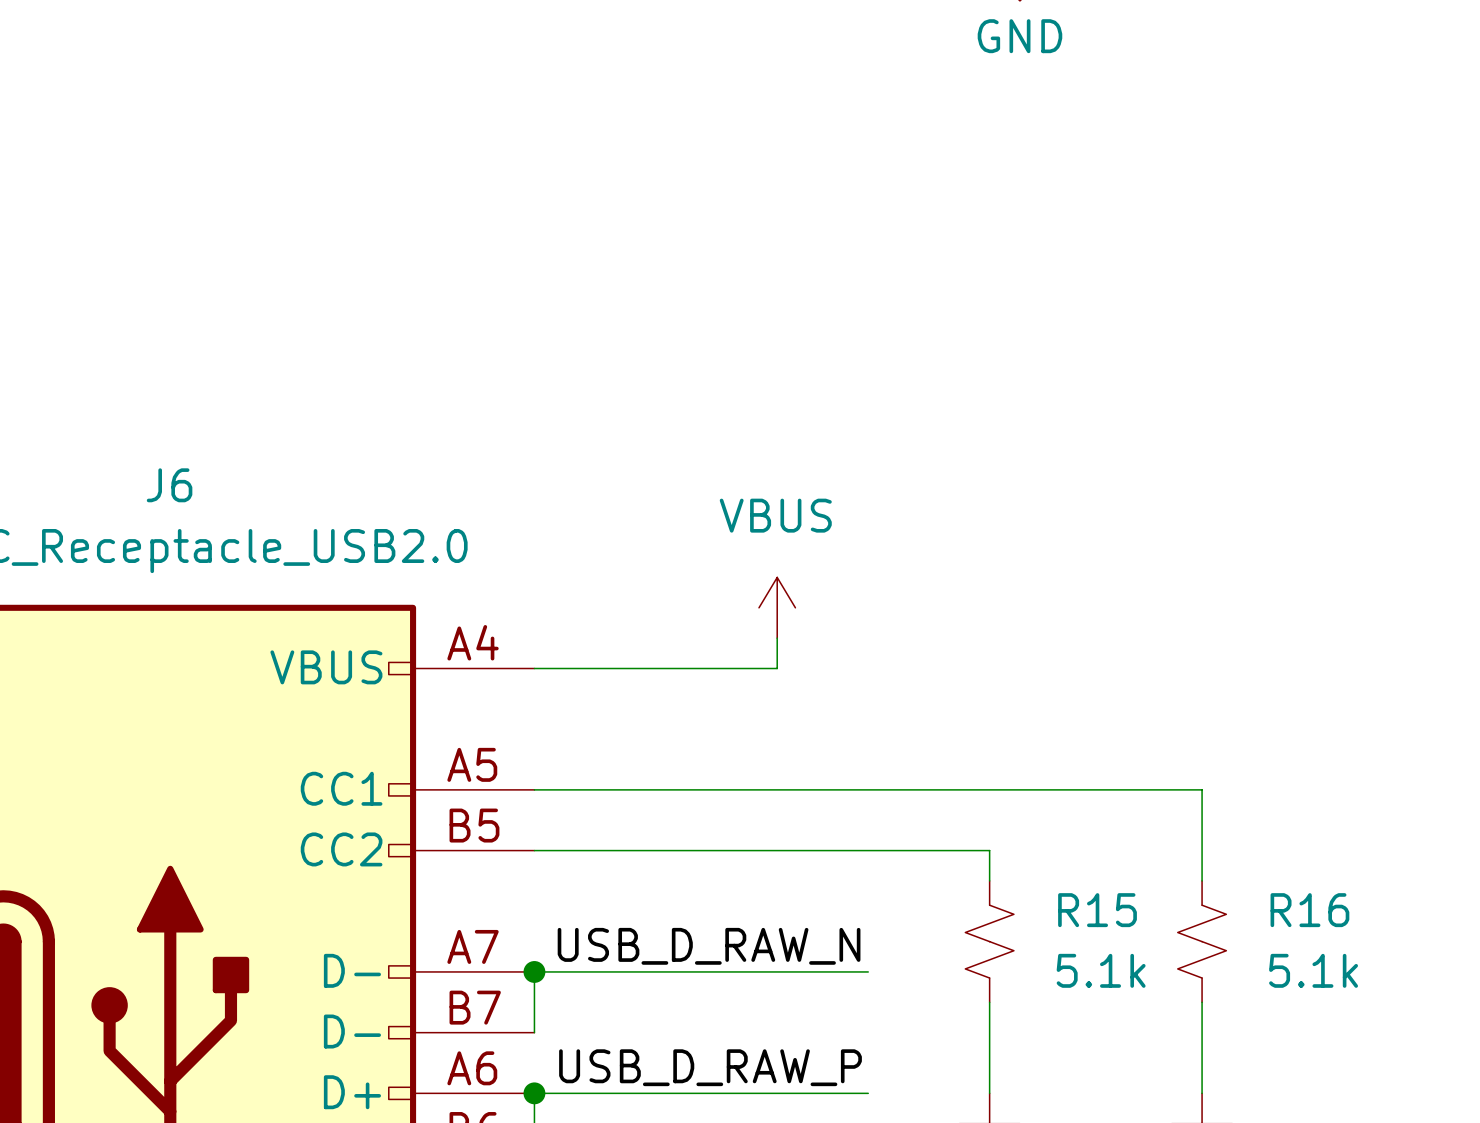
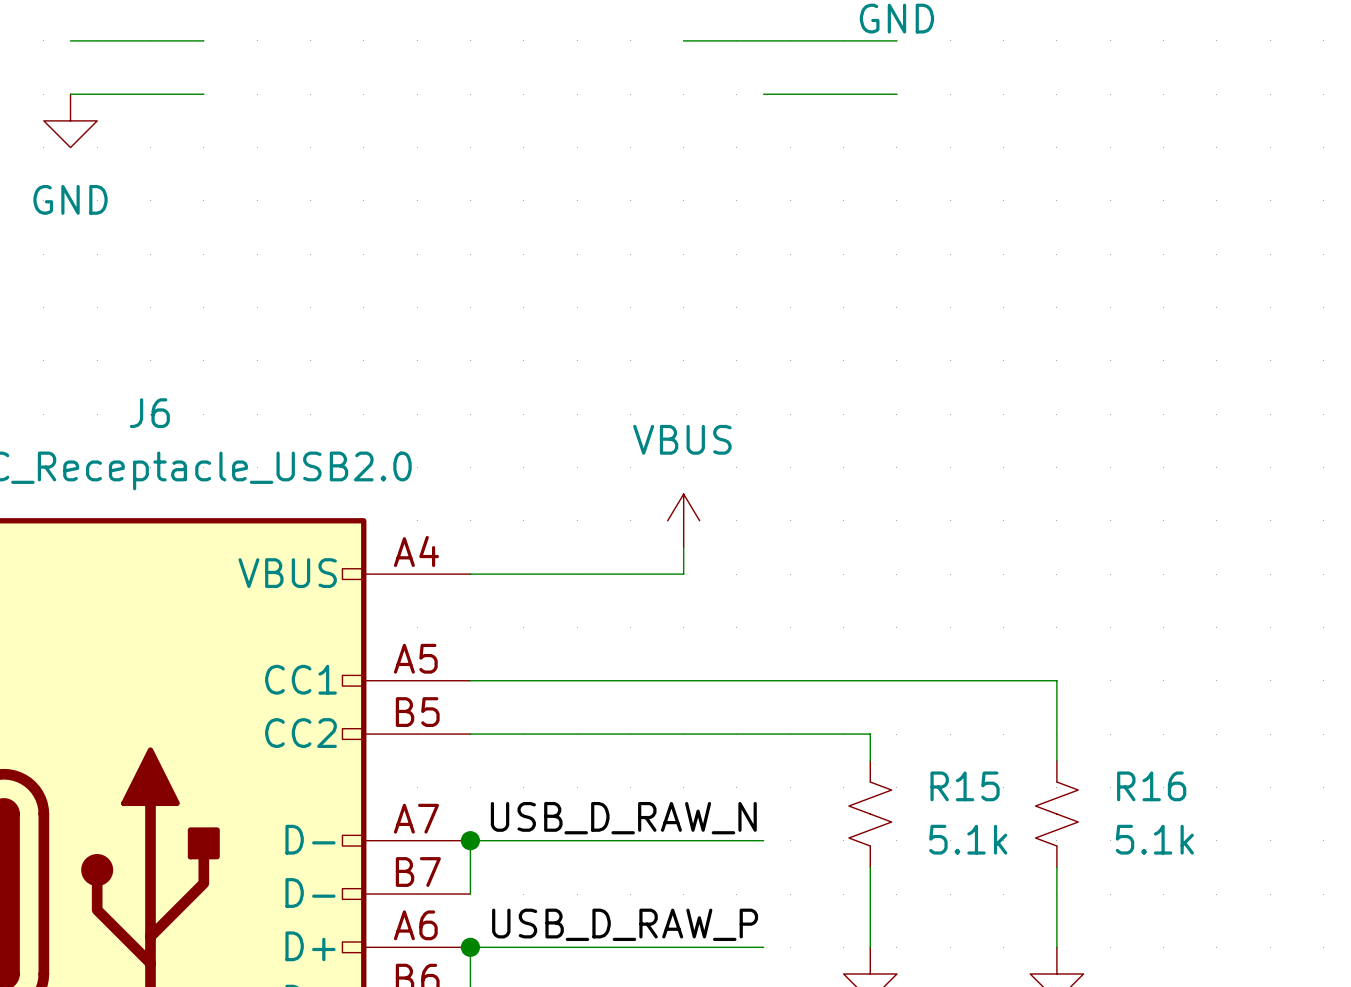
wire: none -> (70, 40) (203, 40)
wire: none -> (683, 40) (896, 40)
wire: none -> (70, 94) (203, 94)
wire: none -> (763, 94) (896, 94)
power symbol: none -> GND (70, 120)

